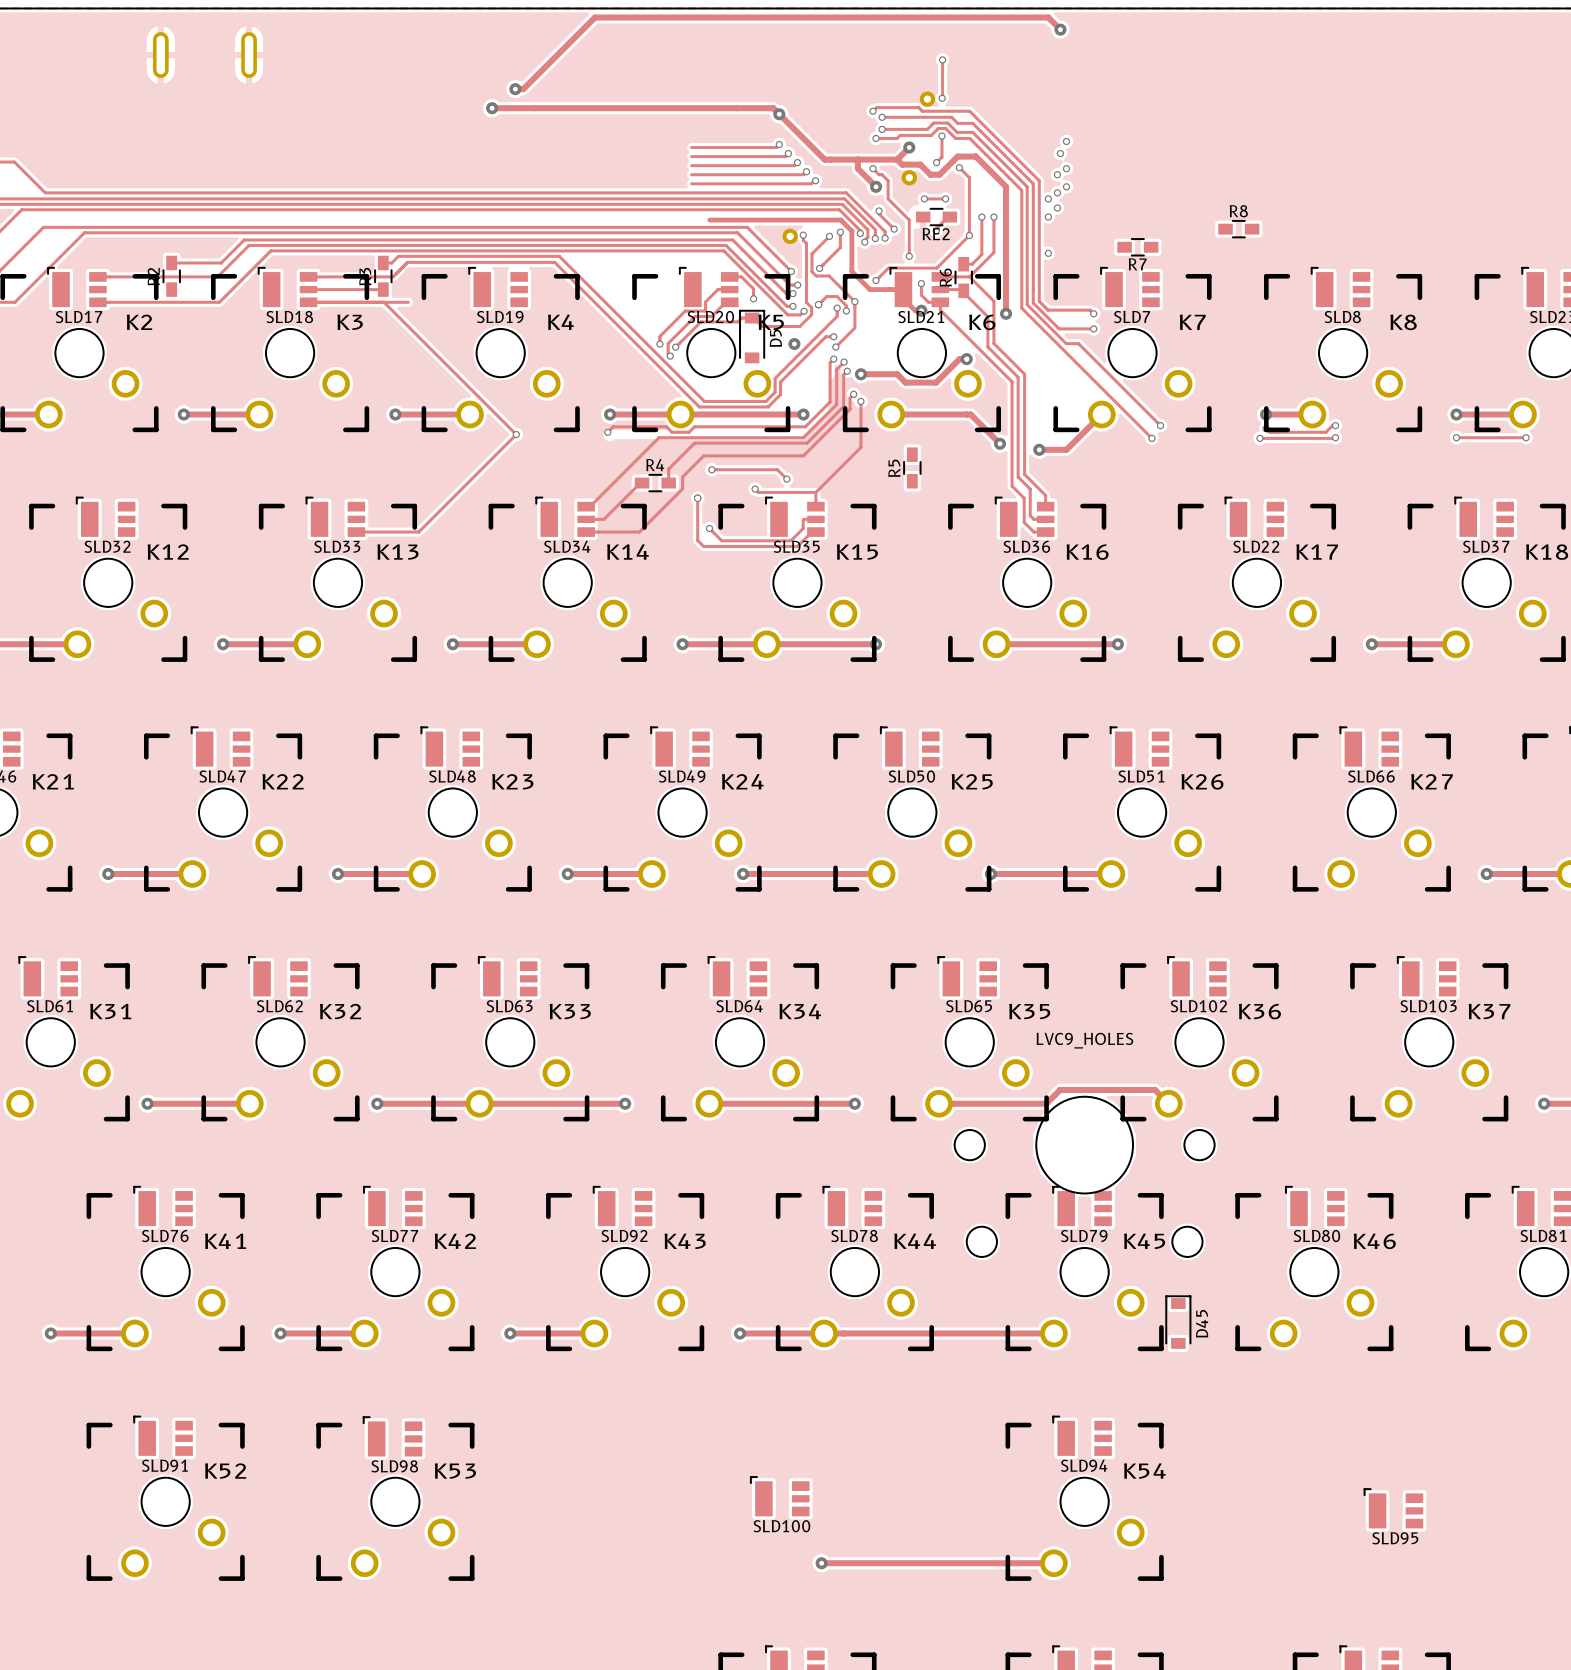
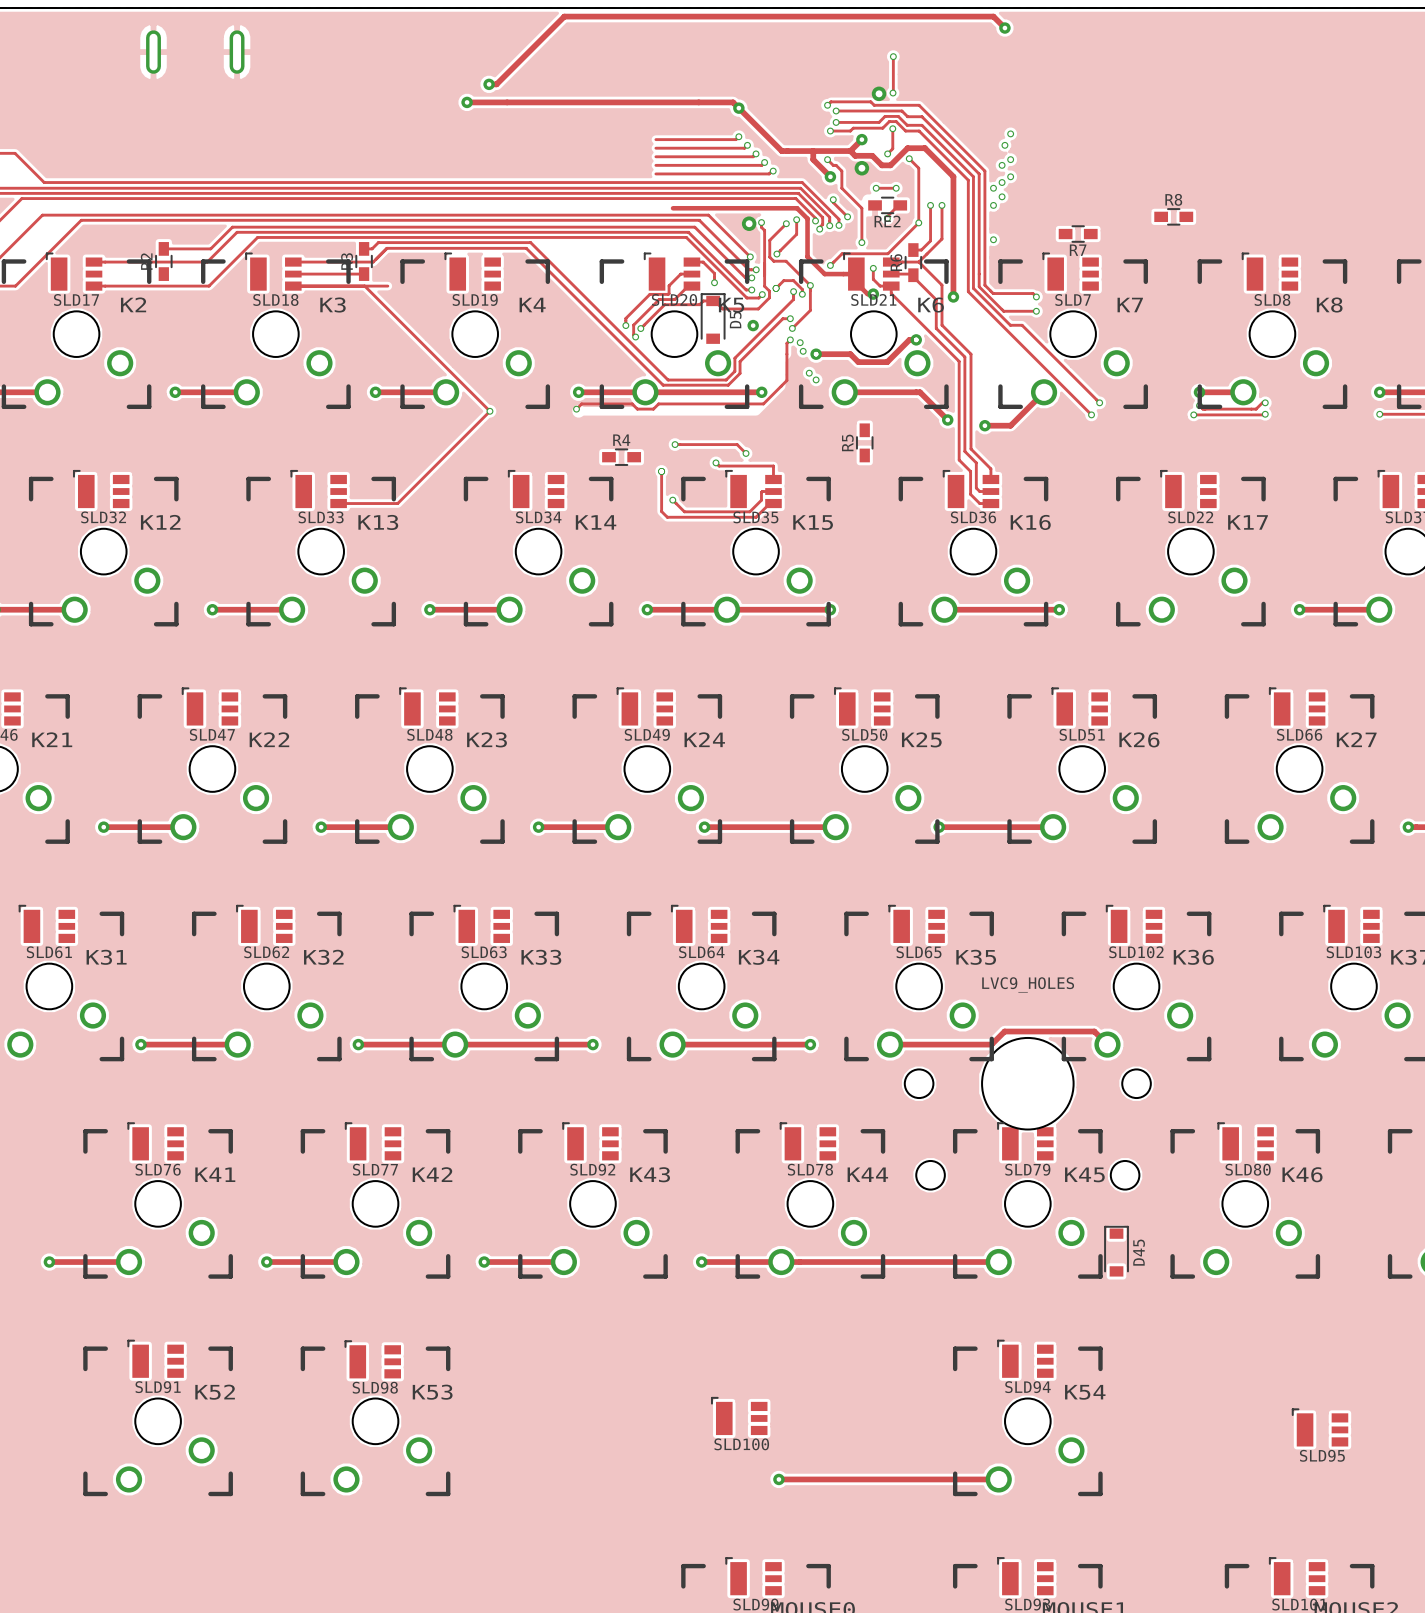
track: (844, 362) (836, 369) (836, 404) (803, 437) (659, 437) (590, 506) (586, 506) -> none
track: (847, 371) (843, 374) (843, 406) (807, 443) (694, 443) (668, 469) (668, 483) -> none
track: (853, 394) (850, 397) (850, 409) (803, 455) (703, 455) (682, 477) (682, 488) (639, 532) (586, 532) -> none
track: (860, 401) (860, 447) (815, 492) -> none
track: (642, 483) (603, 519) (586, 519) -> none

